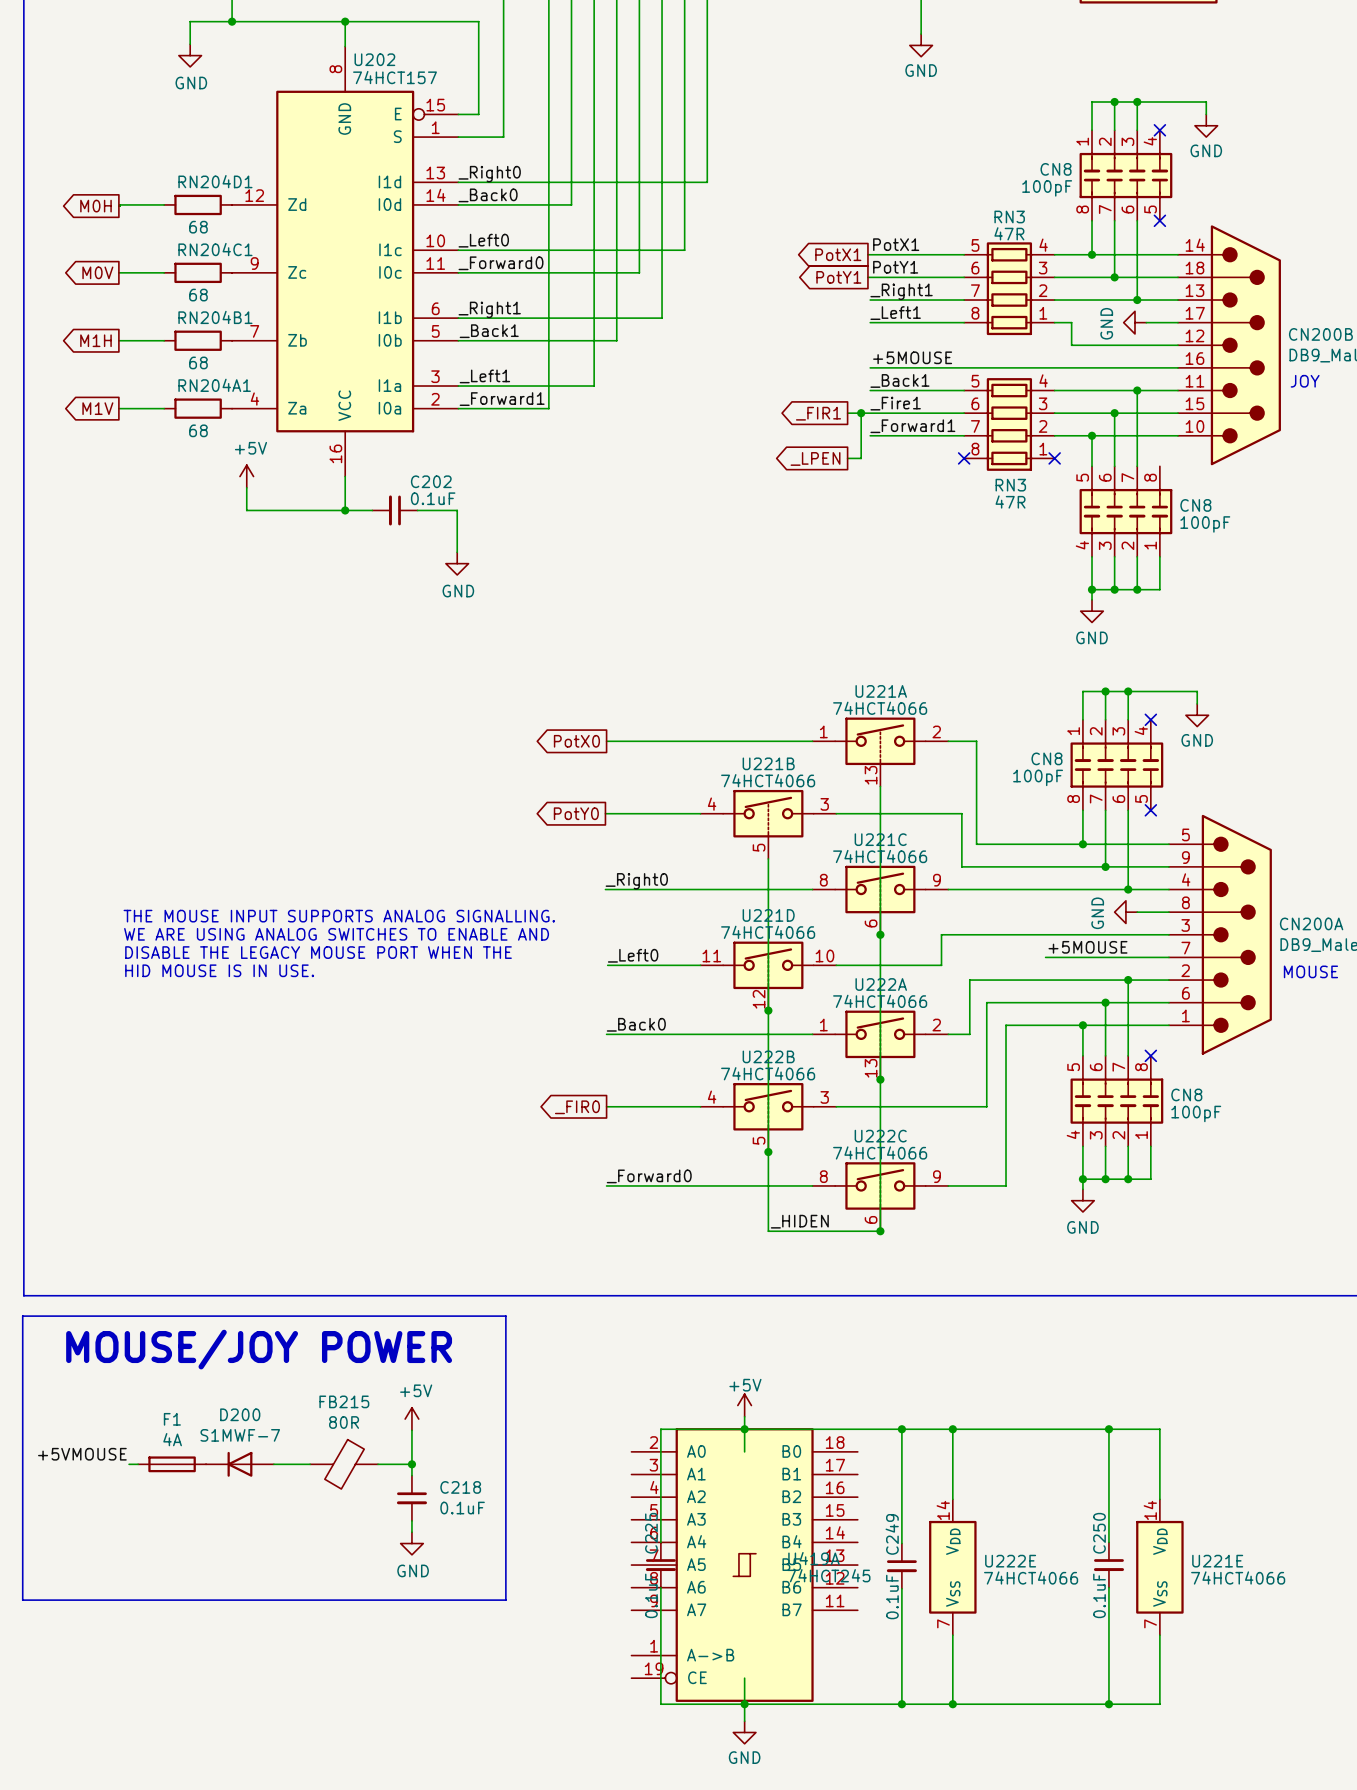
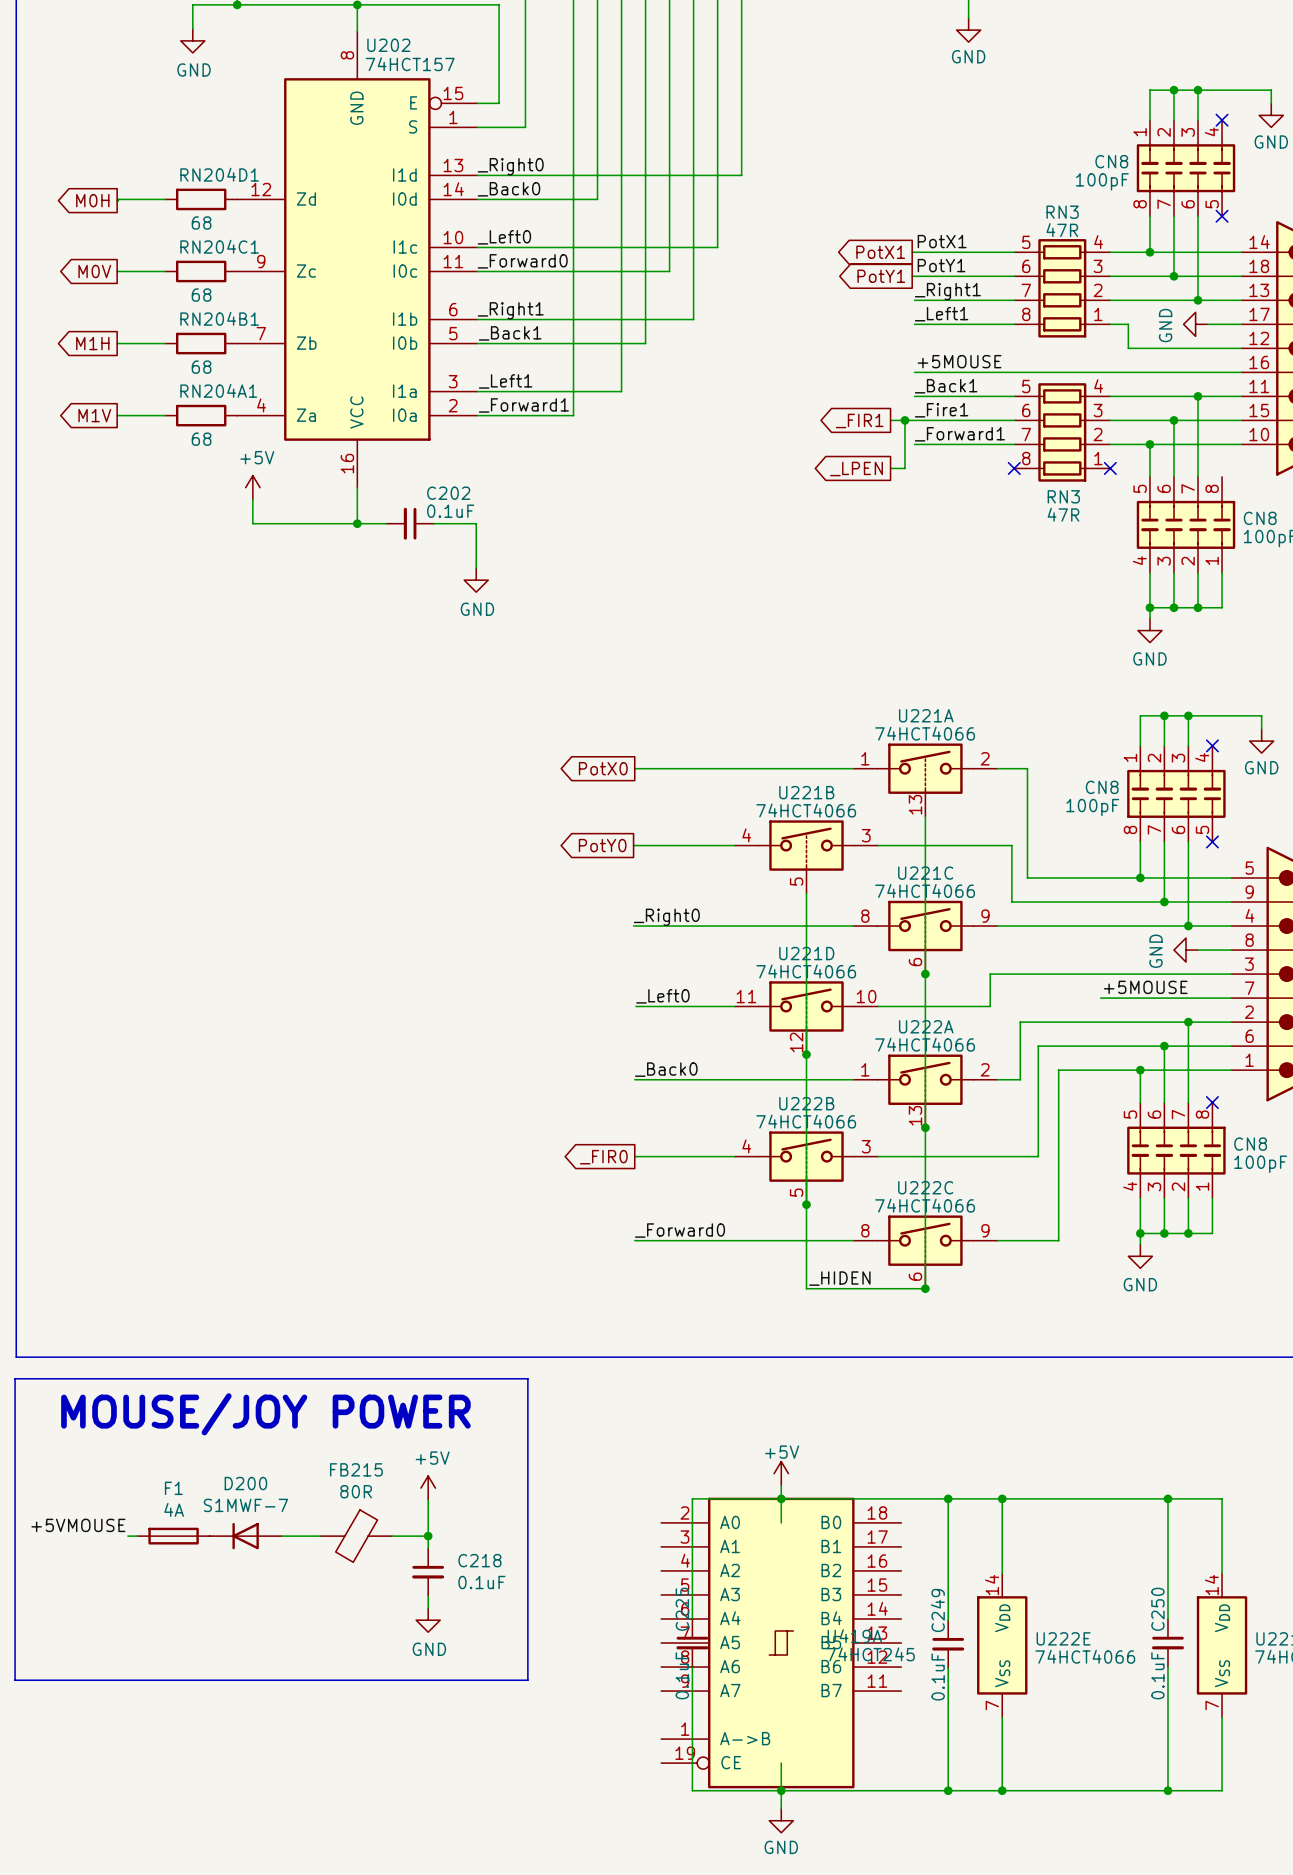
text: THE MOUSE INPUT SUPPORTS ANALOG SIGNALLING. (339, 916) -> none
text: WE ARE USING ANALOG SWITCHES TO ENABLE AND (336, 934) -> none
text: DISABLE THE LEGACY MOUSE PORT WHEN THE (318, 952) -> none
text: HID MOUSE IS IN USE. (219, 970) -> none

